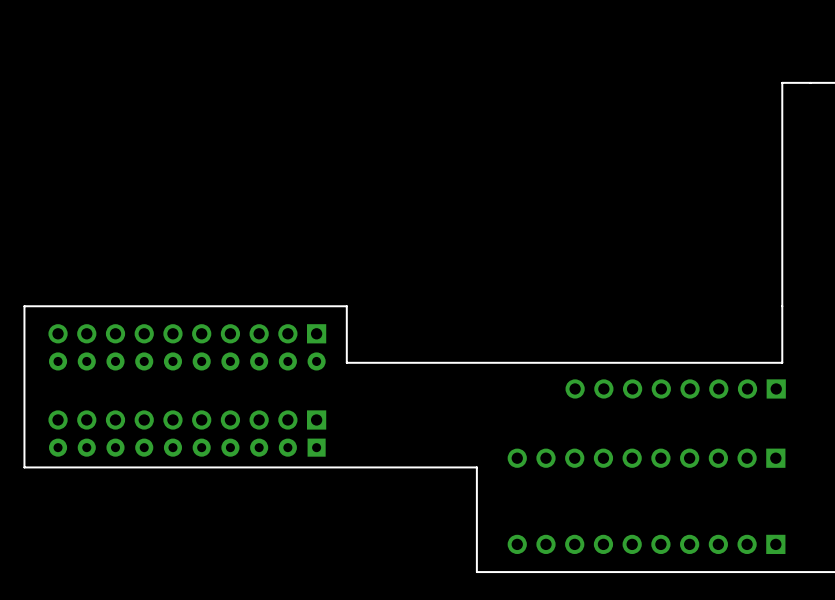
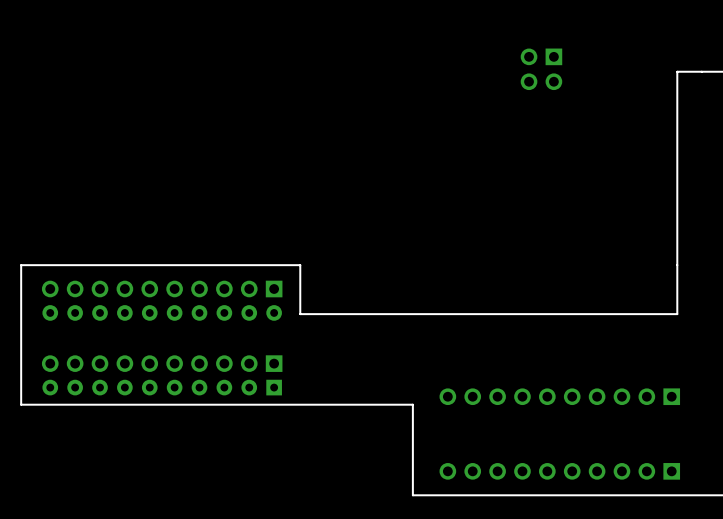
part: none -> (541, 69)
part: (675, 388) -> none

